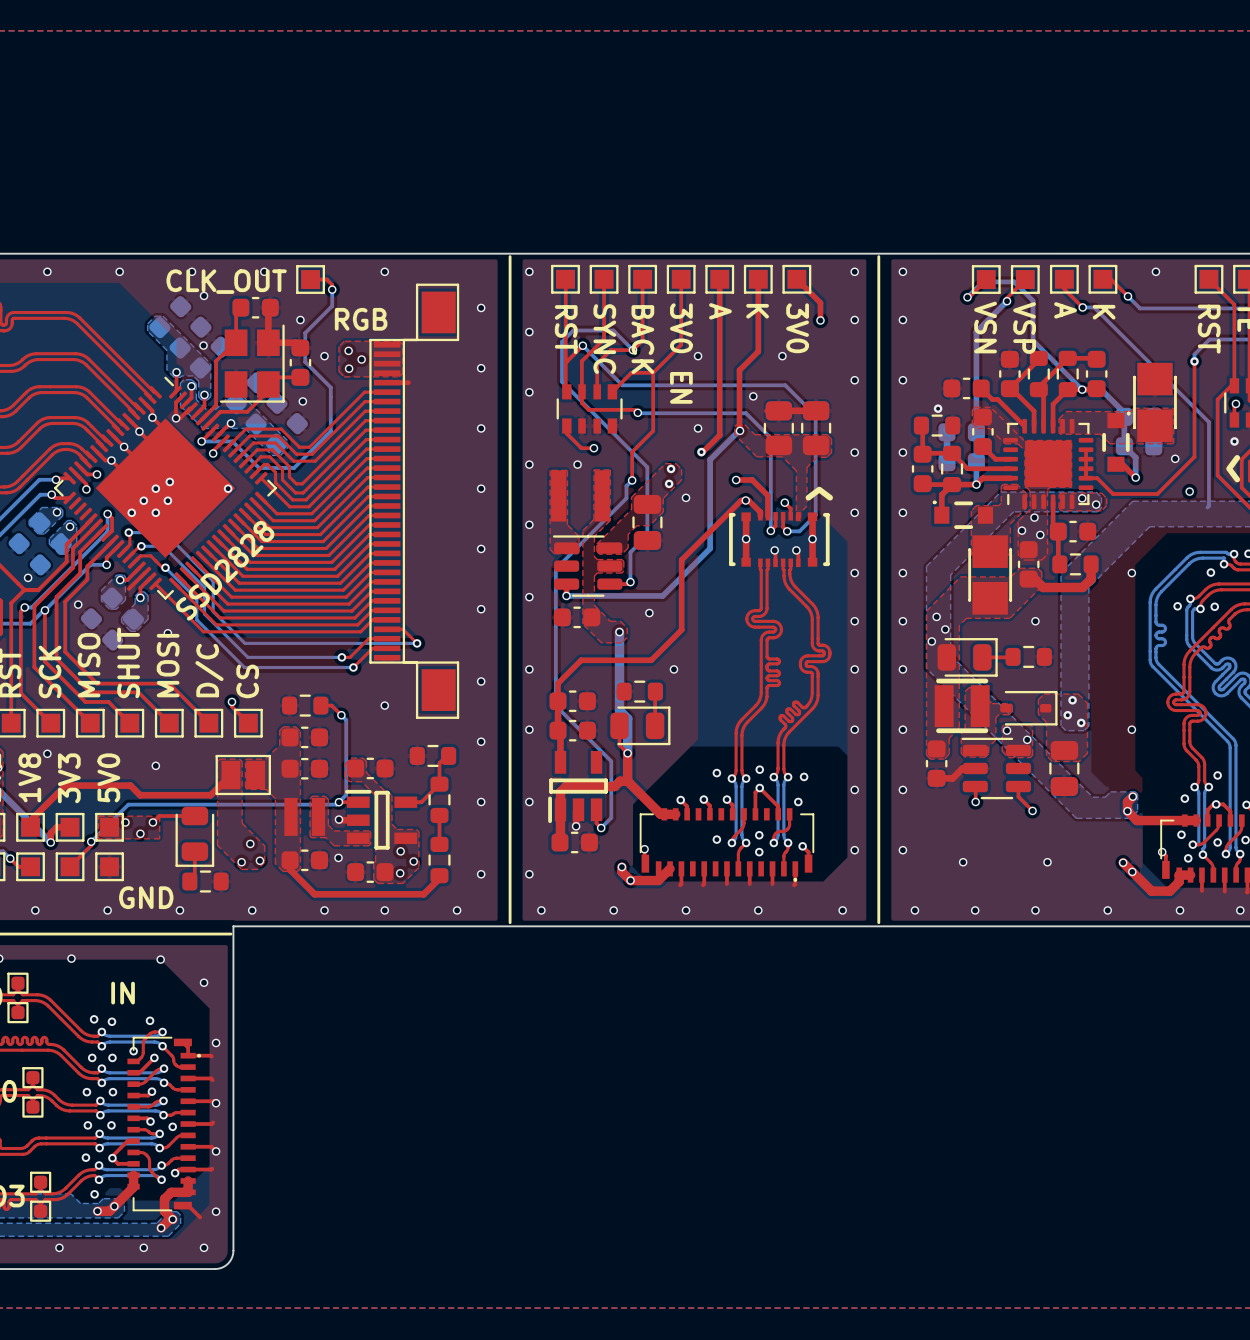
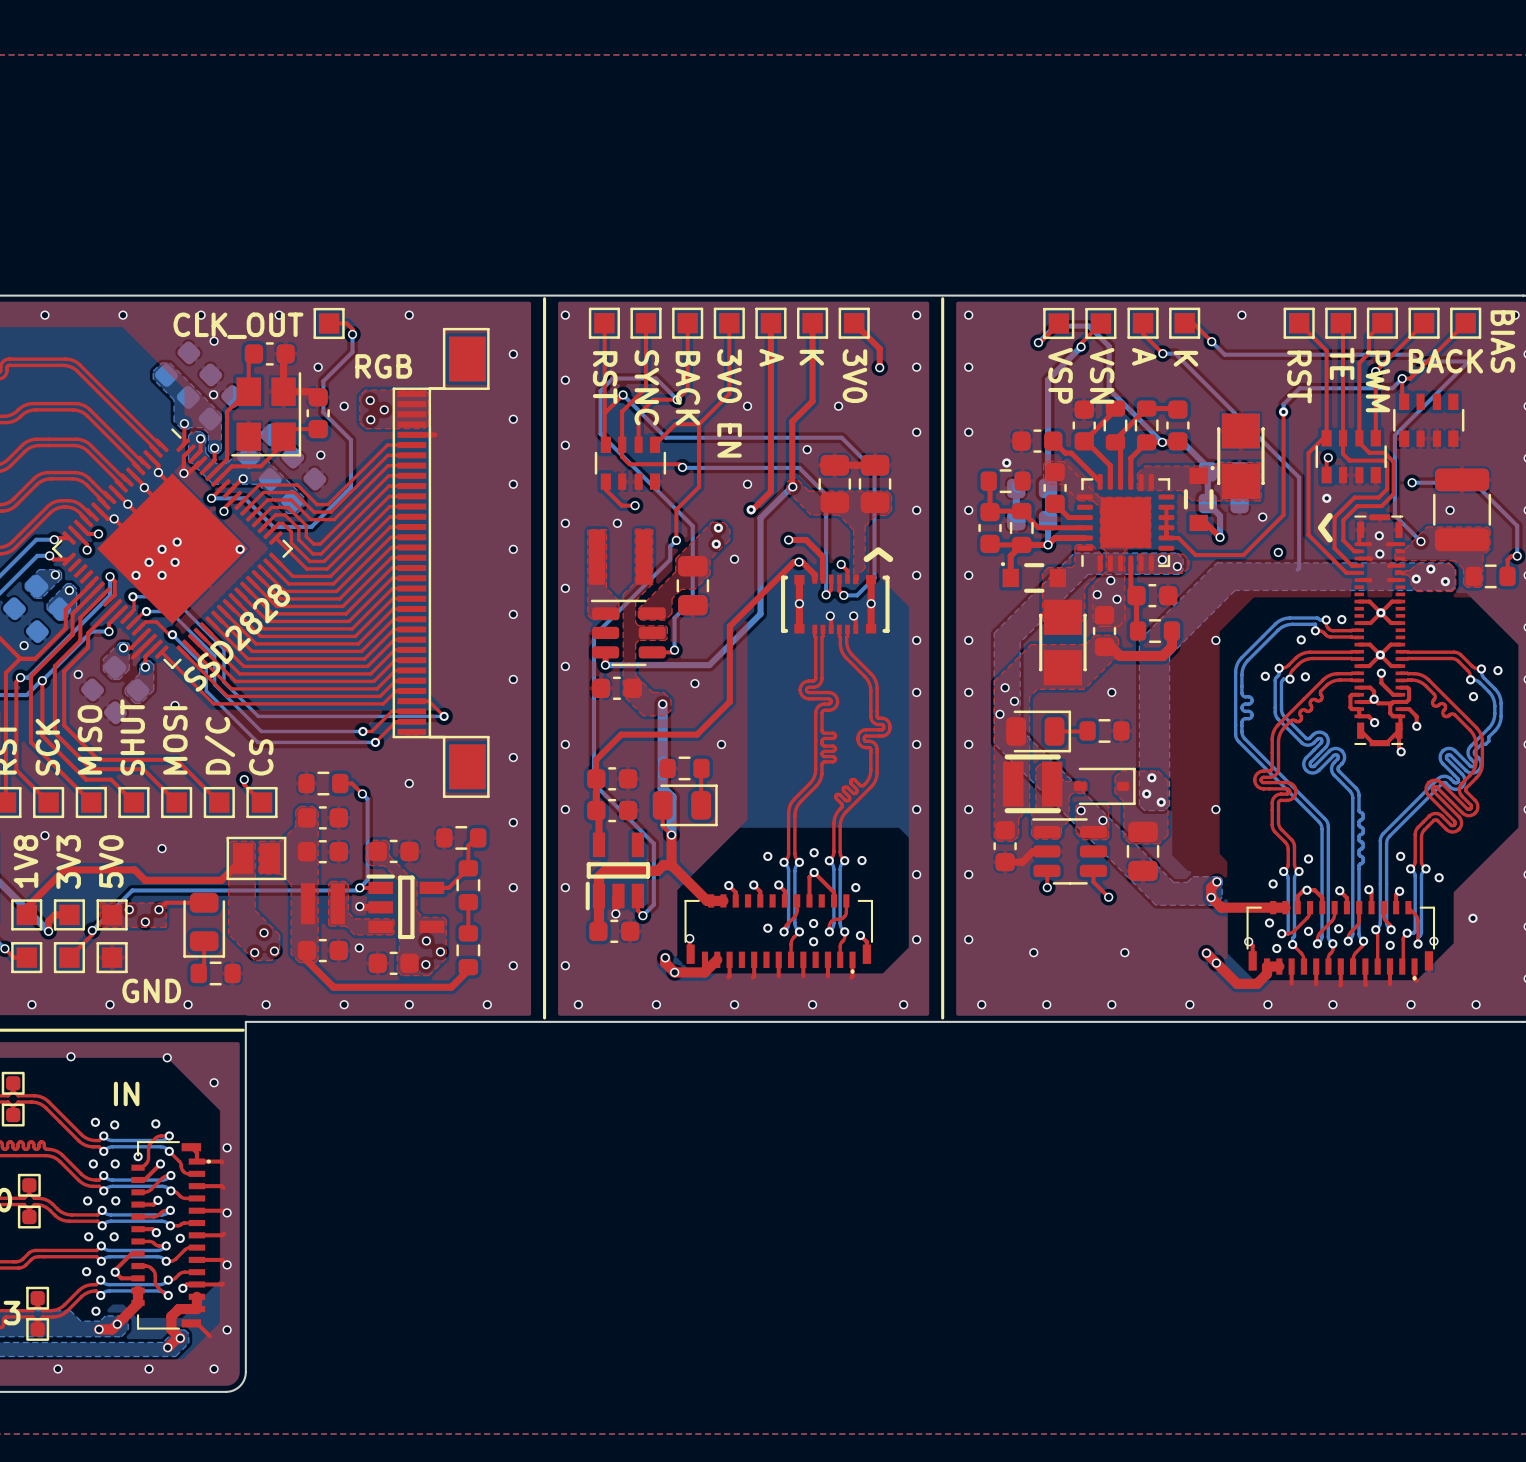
text position: VSN (985, 327) -> VSN (1102, 375)
text position: VSP (1024, 328) -> VSP (1060, 375)

